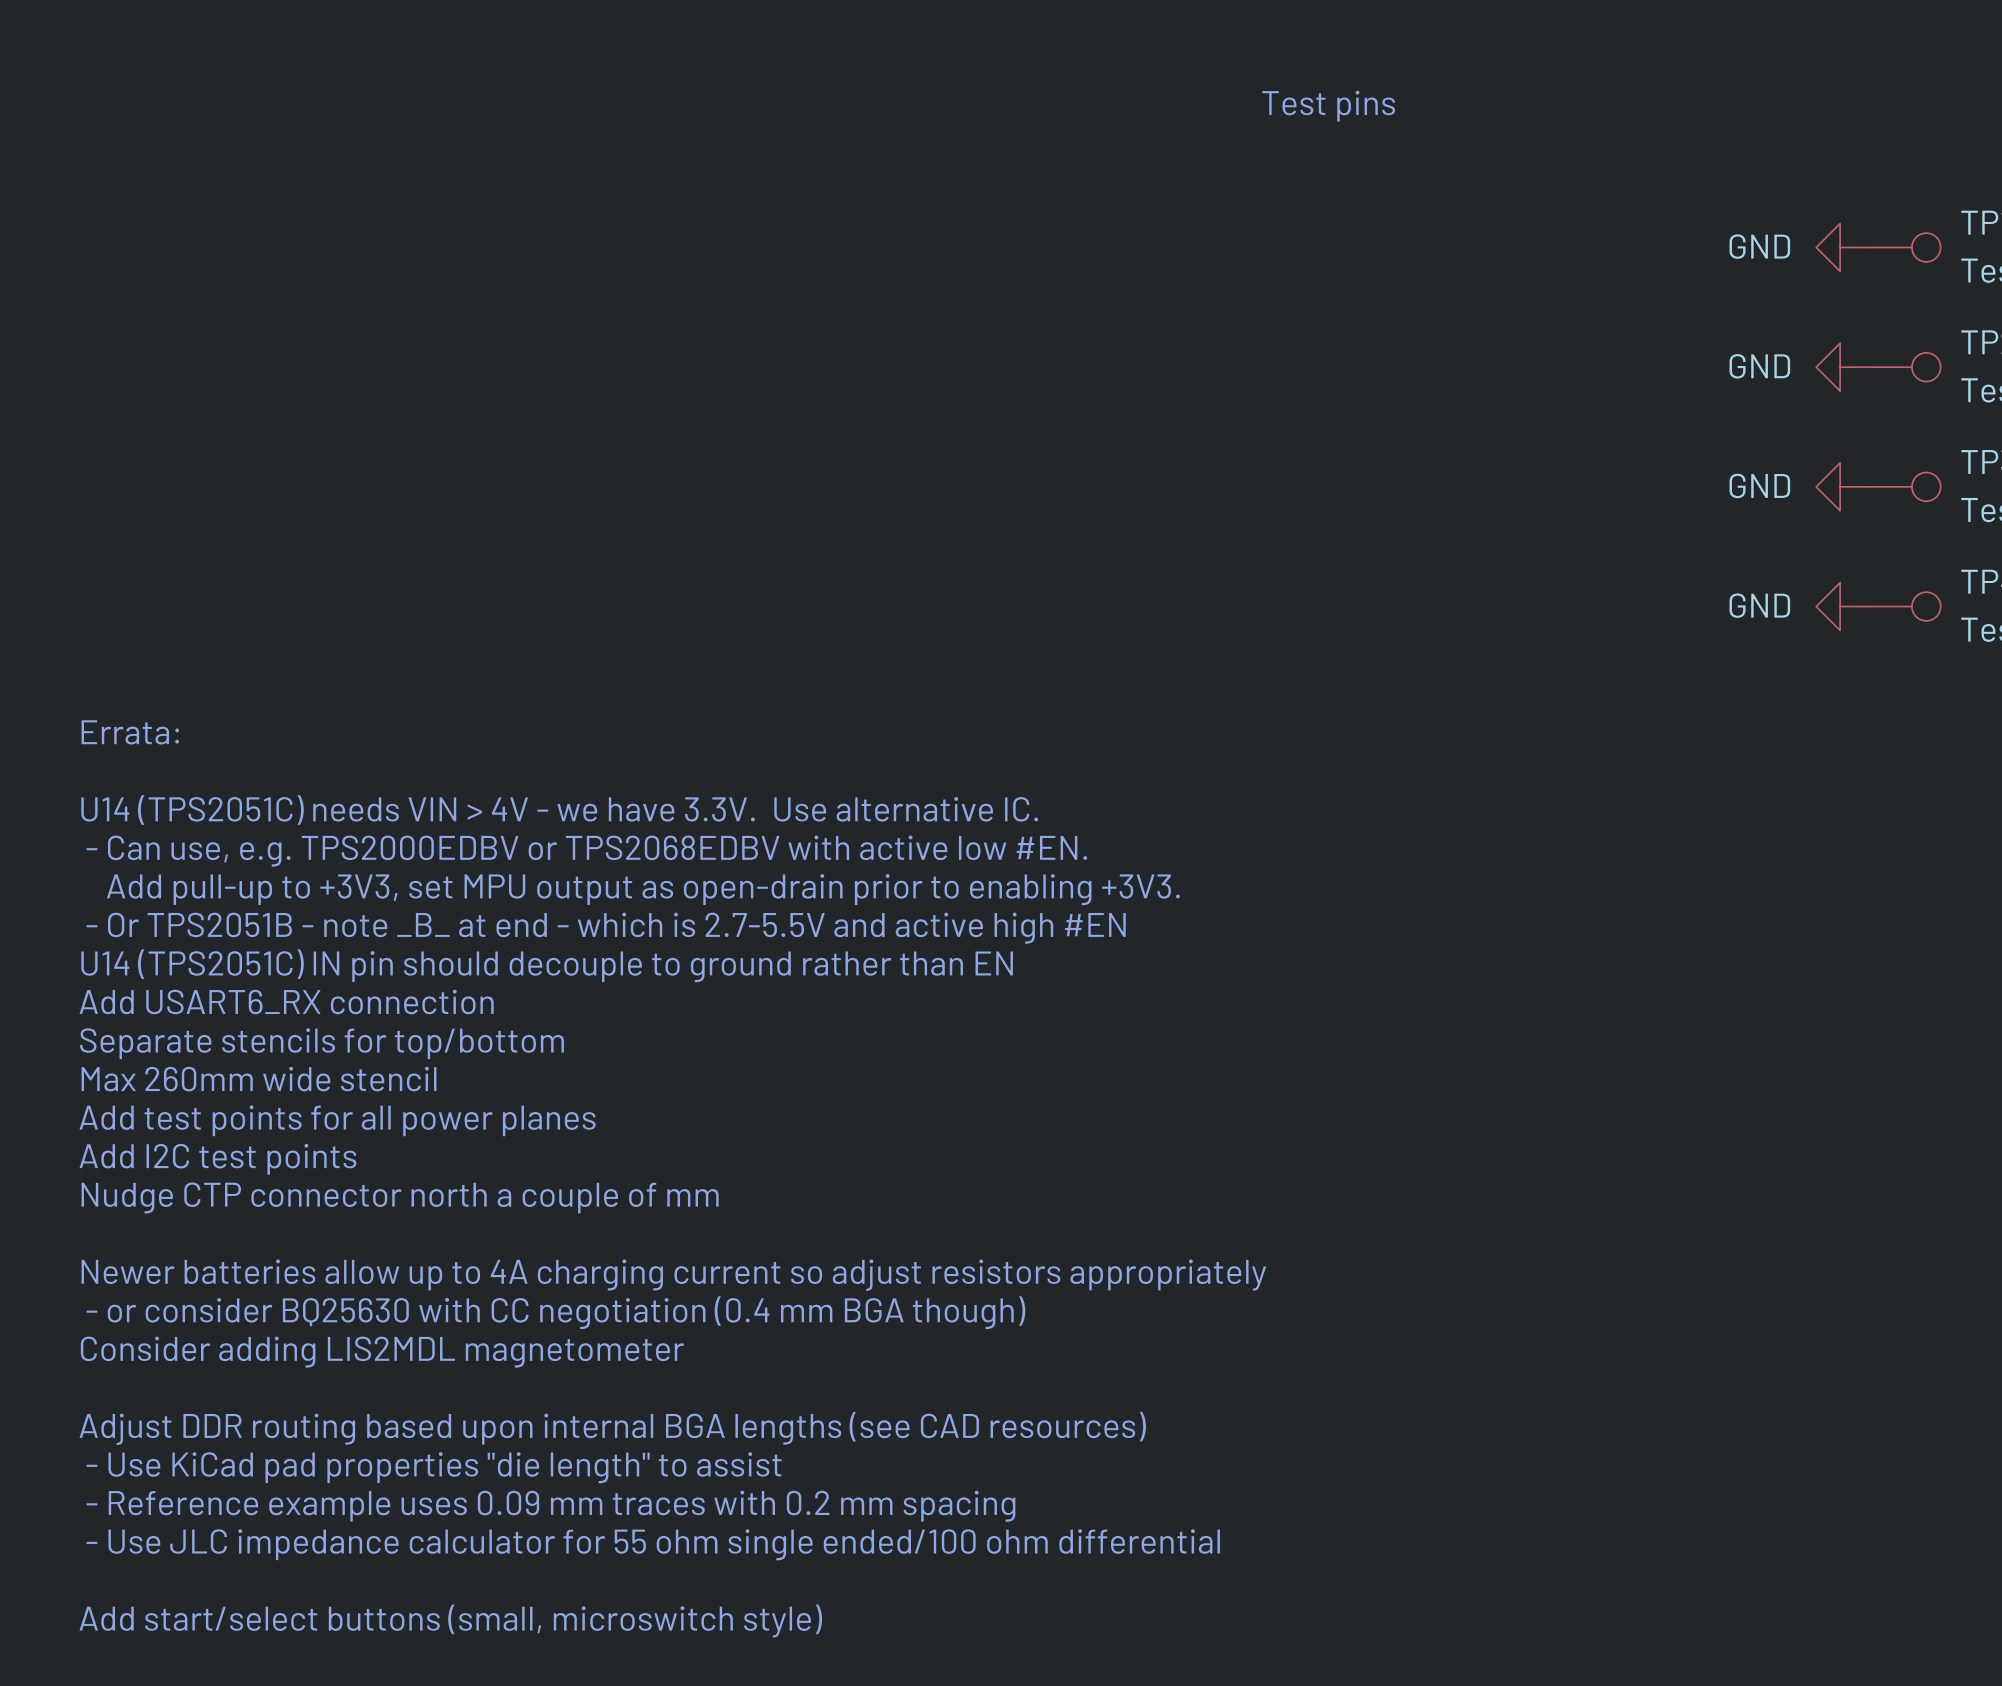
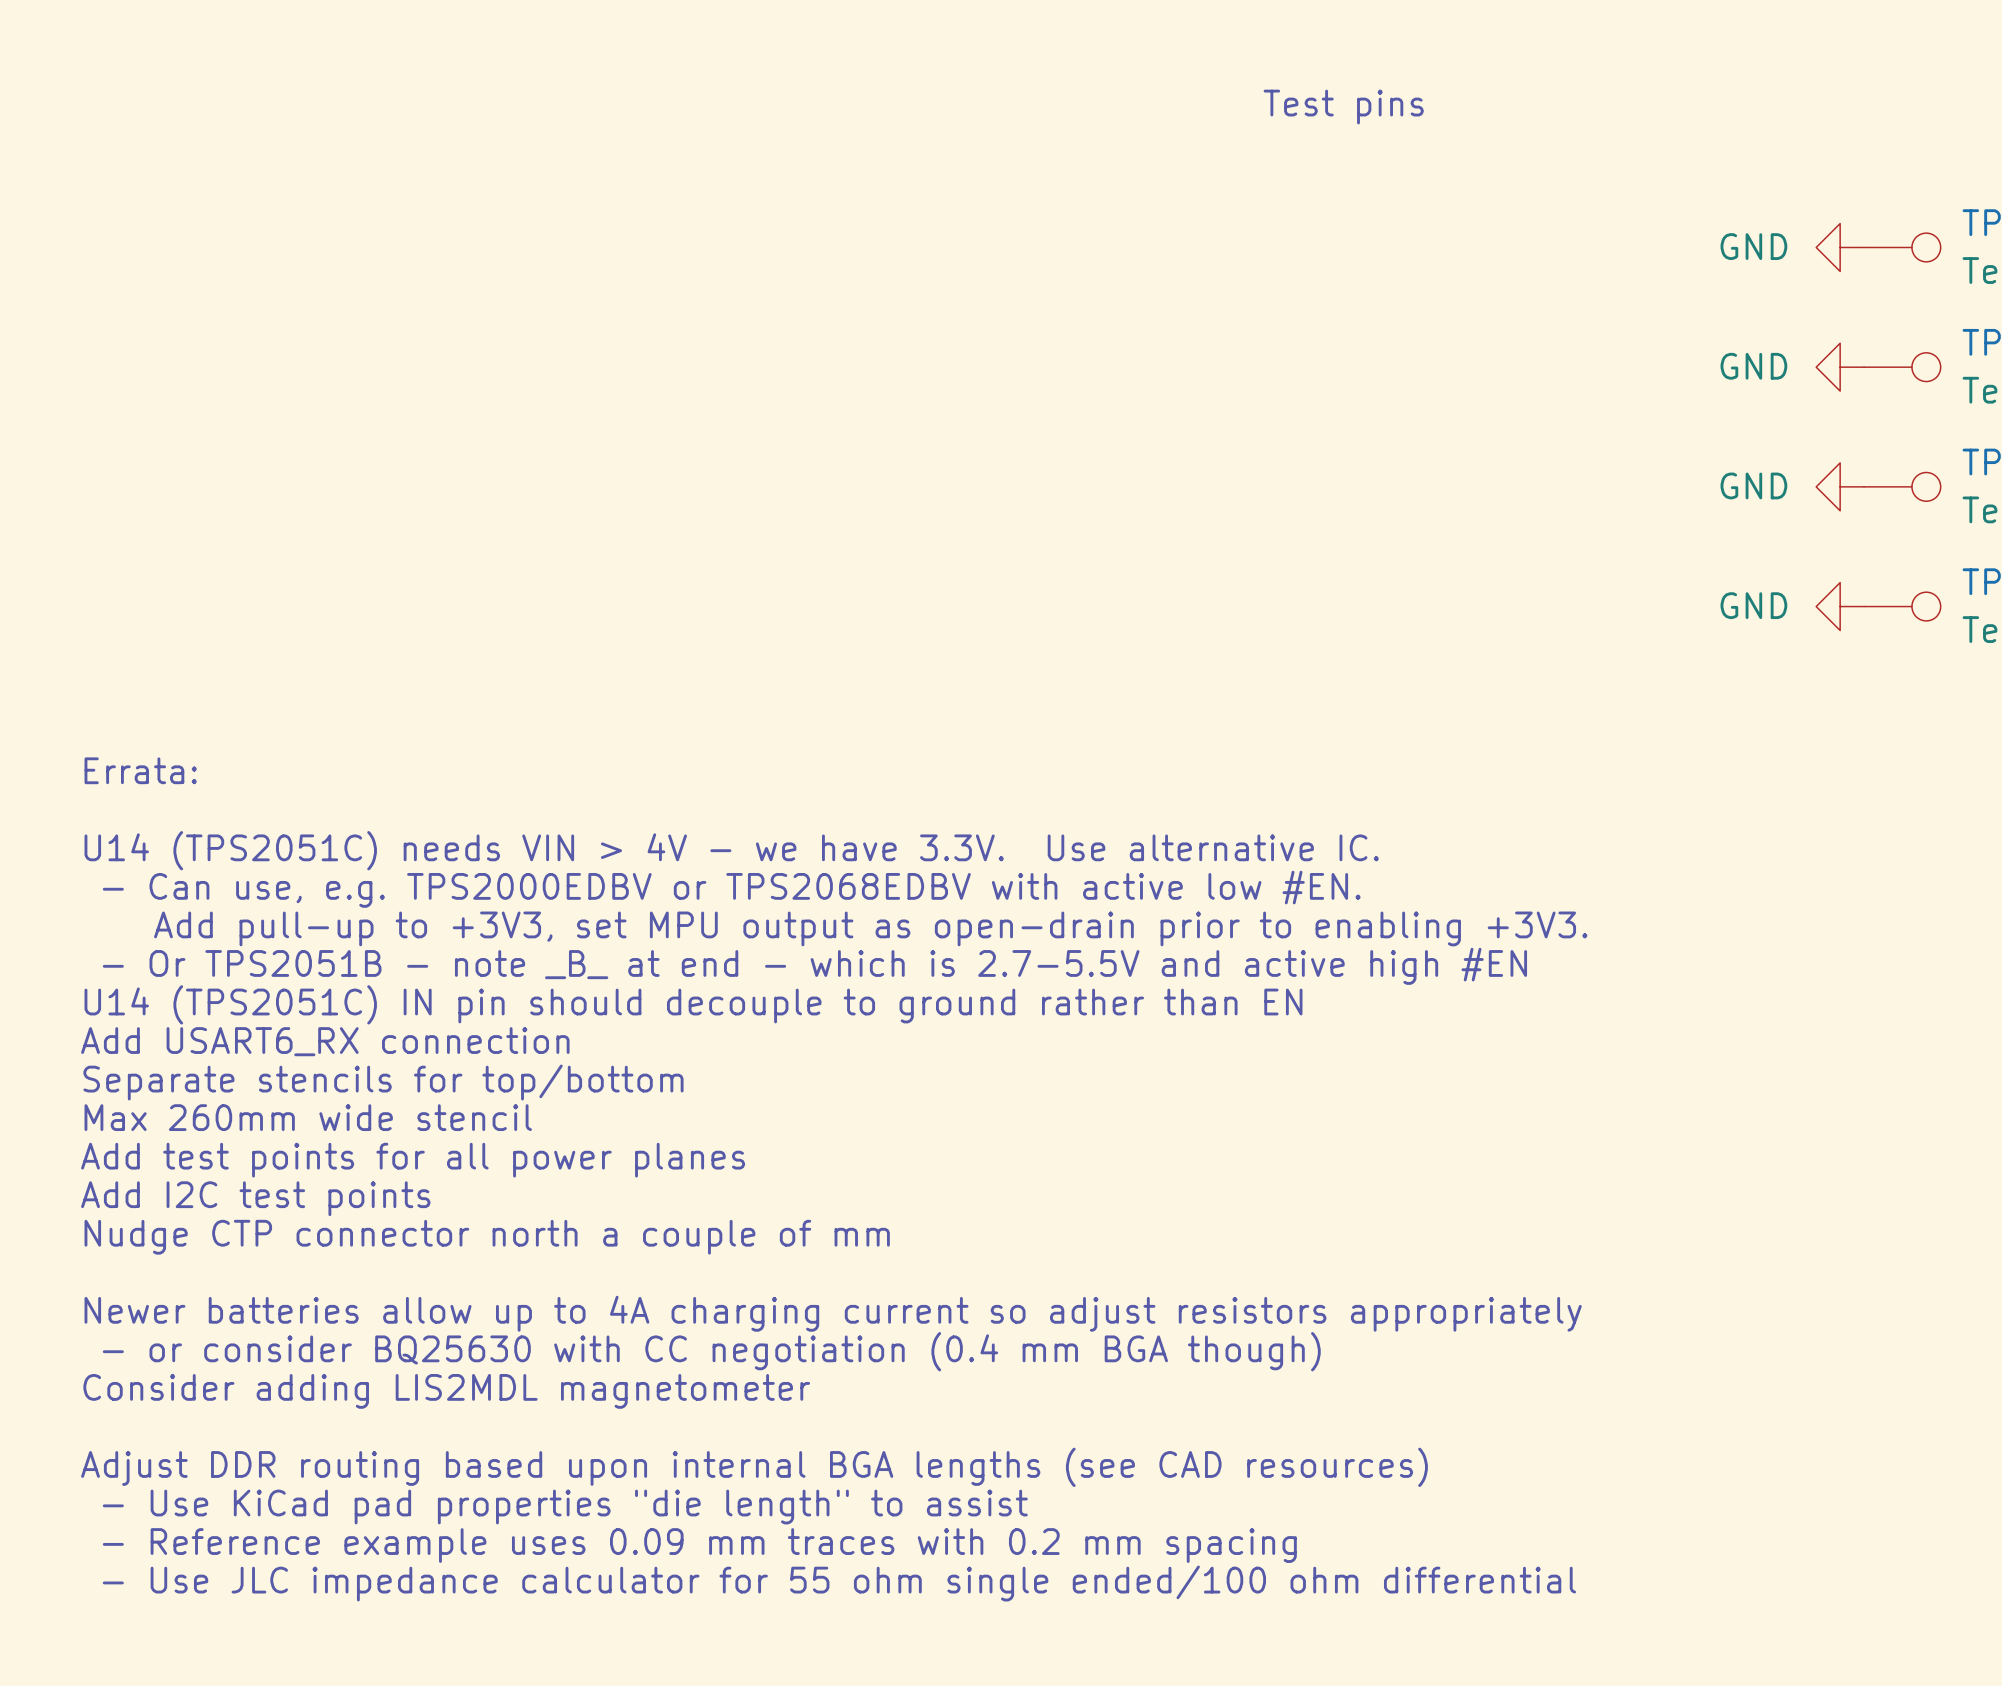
text position: Errata: (130, 732) -> Errata: (140, 770)
text: U14 (TPS2051C) needs VIN > 4V - we have 3.3V. Use alternative IC. (559, 810) -> none
text: - Can use, e.g. TPS2000EDBV or TPS2068EDBV with active low #EN. (586, 851) -> U14 (TPS2051C) needs VIN > 4V - we have 3.3V. Use alternative IC. (731, 850)
text: Add pull-up to +3V3, set MPU output as open-drain prior to enabling +3V3. (643, 889) -> - Can use, e.g. TPS2000EDBV or TPS2068EDBV with active low #EN. (731, 889)
text: - Or TPS2051B - note _B_ at end - which is 2.7-5.5V and active high #EN (606, 928) -> Add pull-up to +3V3, set MPU output as open-drain prior to enabling +3V3. (870, 928)
text: U14 (TPS2051C) IN pin should decouple to ground rather than EN (547, 965) -> - Or TPS2051B - note _B_ at end - which is 2.7-5.5V and active high #EN (814, 966)
text: Add USART6_RX connection (286, 1001) -> U14 (TPS2051C) IN pin should decouple to ground rather than EN (693, 1004)
text: Separate stencils for top/bottom (322, 1043) -> Add USART6_RX connection (325, 1041)
text: Max 260mm wide stencil (259, 1079) -> Separate stencils for top/bottom (383, 1082)
text: Add test points for all power planes (337, 1120) -> Max 260mm wide stencil (308, 1117)
text: Add I2C test points (217, 1159) -> Add test points for all power planes (413, 1160)
text: Nudge CTP connector north a couple of mm (400, 1197) -> Add I2C test points (255, 1198)
text: none -> Nudge CTP connector north a couple of mm (487, 1237)
text: Newer batteries allow up to 4A charging current so adjust resistors appropriately (673, 1275) -> none
text: - or consider BQ25630 with CC negotiation (0.4 mm BGA though) (555, 1312) -> Newer batteries allow up to 4A charging current so adjust resistors appropriately (833, 1313)
text: Consider adding LIS2MDL magnetometer (382, 1352) -> - or consider BQ25630 with CC negotiation (0.4 mm BGA though) (711, 1351)
text: none -> Consider adding LIS2MDL magnetometer (446, 1391)
text: Adjust DDR routing based upon internal BGA lengths (see CAD resources) (612, 1428) -> none
text: - Use KiCad pad properties "die length" to assist (434, 1467) -> Adjust DDR routing based upon internal BGA lengths (see CAD resources) (754, 1467)
text: - Reference example uses 0.09 mm traces with 0.2 mm spacing (550, 1506) -> - Use KiCad pad properties "die length" to assist (565, 1507)
text: - Use JLC impedance calculator for 55 ohm single ended/100 ohm differential (653, 1544) -> - Reference example uses 0.09 mm traces with 0.2 mm spacing (699, 1545)
text: none -> - Use JLC impedance calculator for 55 ohm single ended/100 ohm differential (839, 1583)
text: Add start/select buttons (small, microswitch style) (450, 1620) -> none

